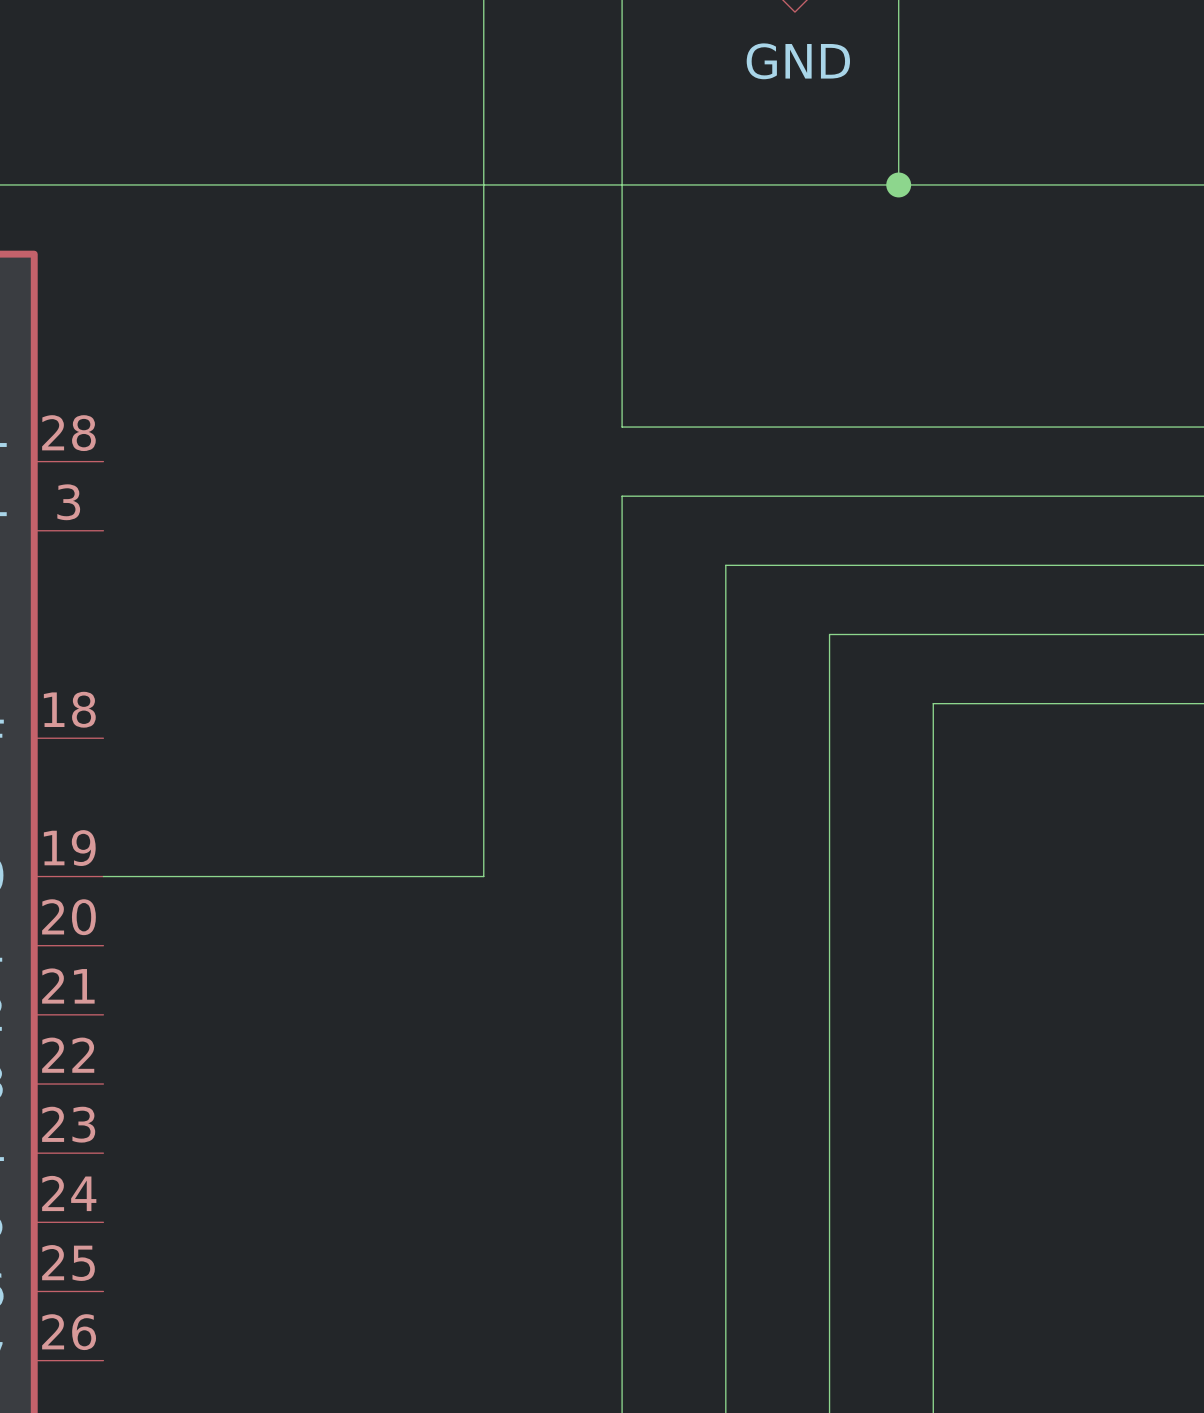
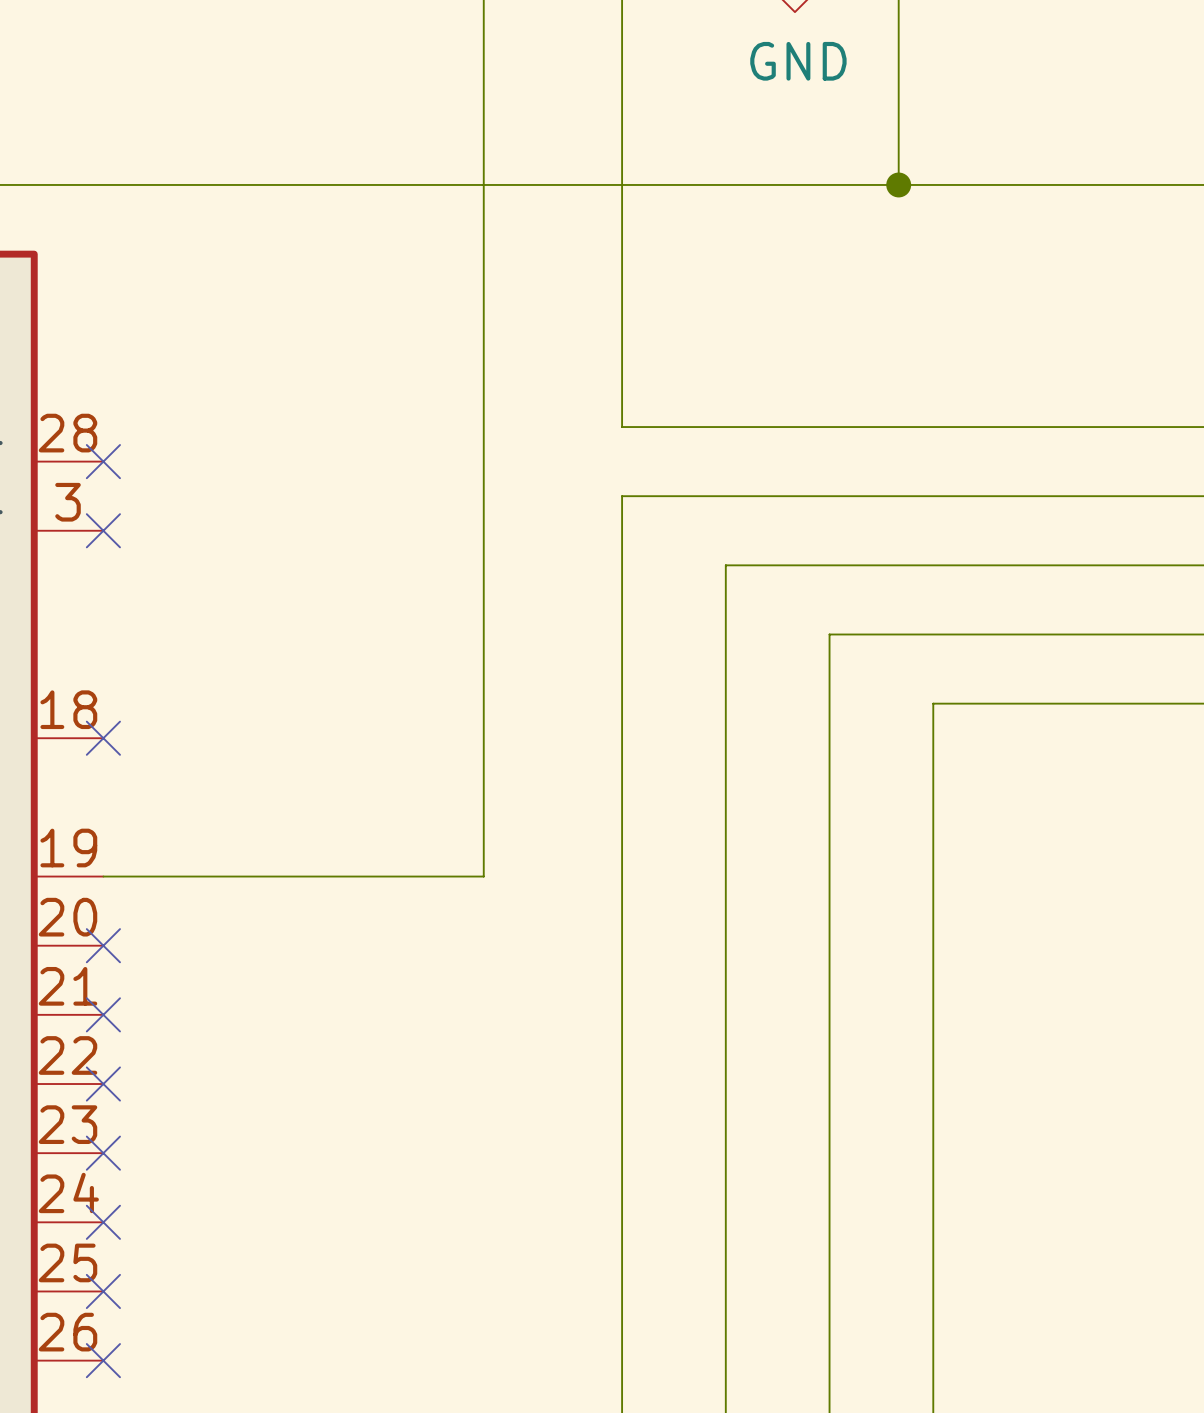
no-connect mark: none -> (103, 461)
no-connect mark: none -> (103, 530)
no-connect mark: none -> (103, 738)
no-connect mark: none -> (103, 945)
no-connect mark: none -> (103, 1014)
no-connect mark: none -> (103, 1084)
no-connect mark: none -> (103, 1153)
no-connect mark: none -> (103, 1222)
no-connect mark: none -> (103, 1291)
no-connect mark: none -> (103, 1360)

